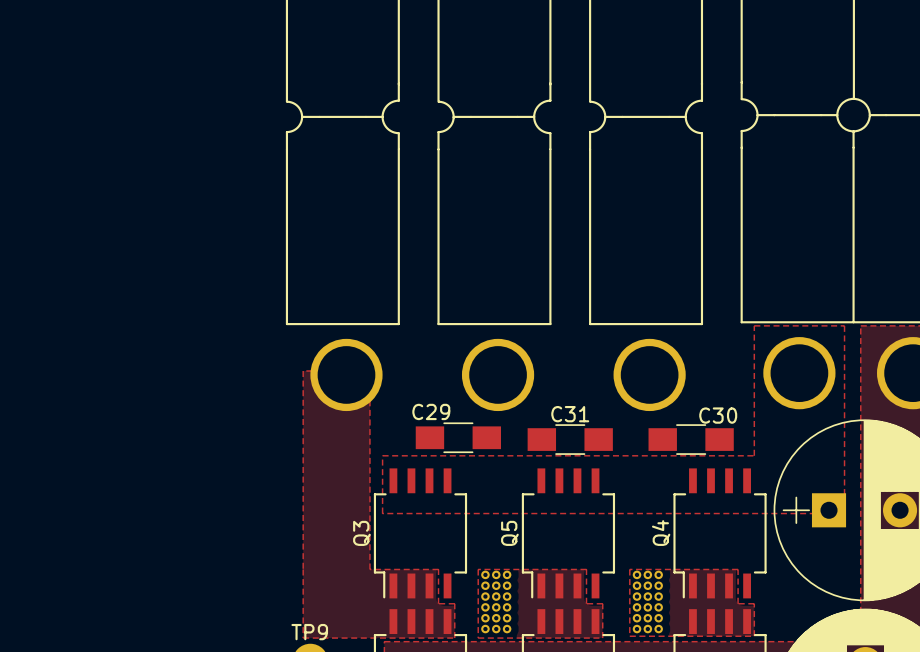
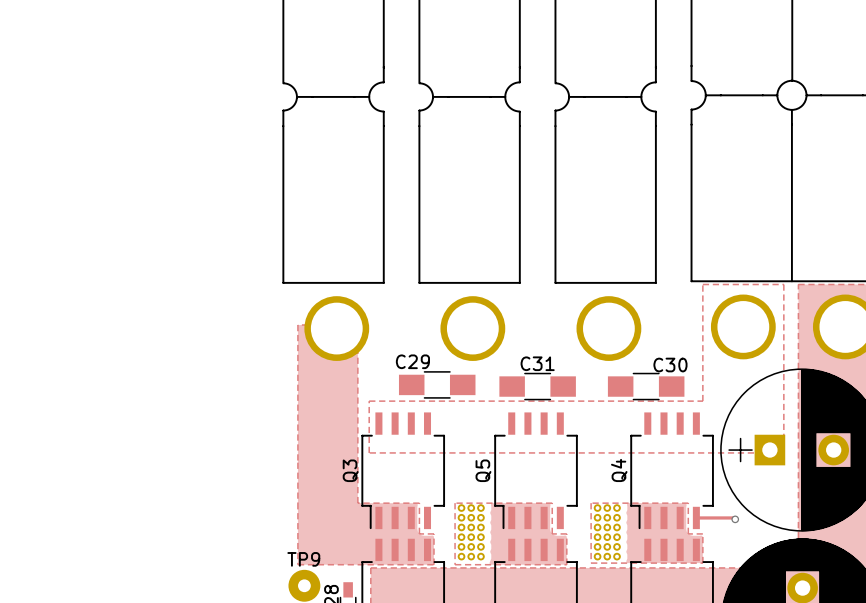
track: none -> (696, 517) (735, 519)
via: none -> (735, 519)

